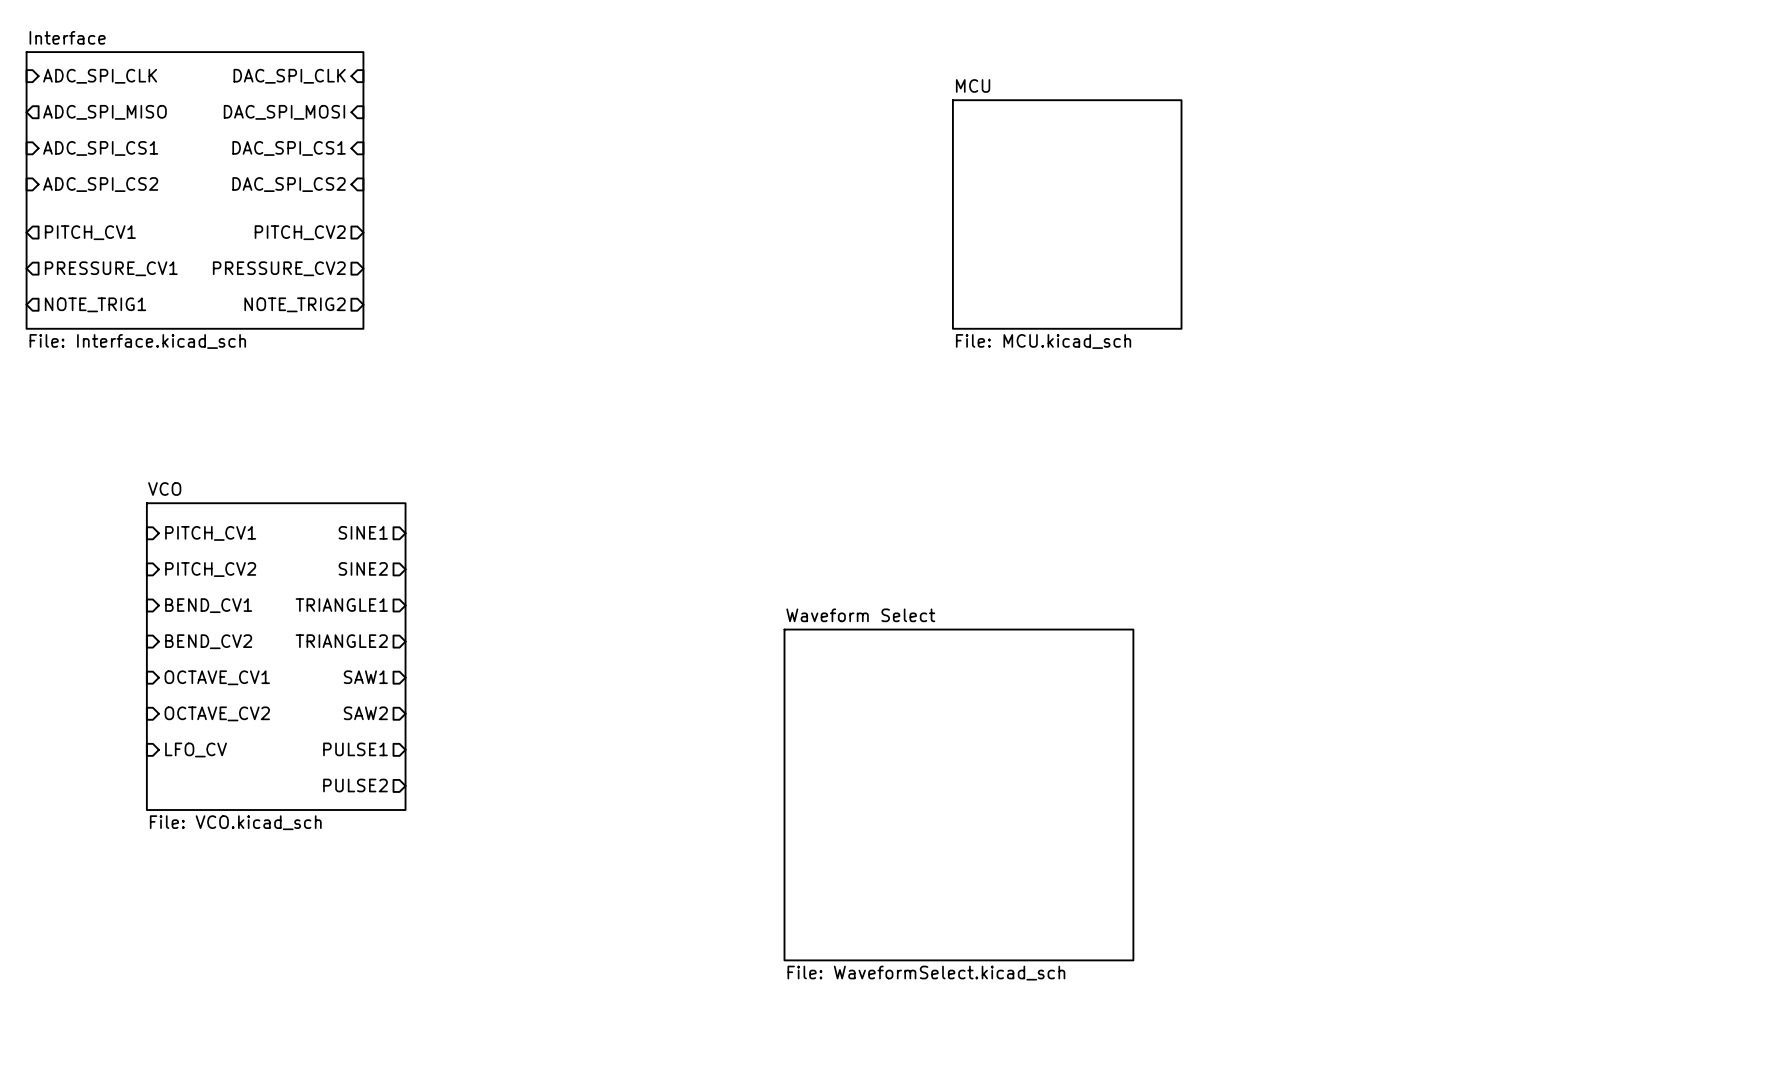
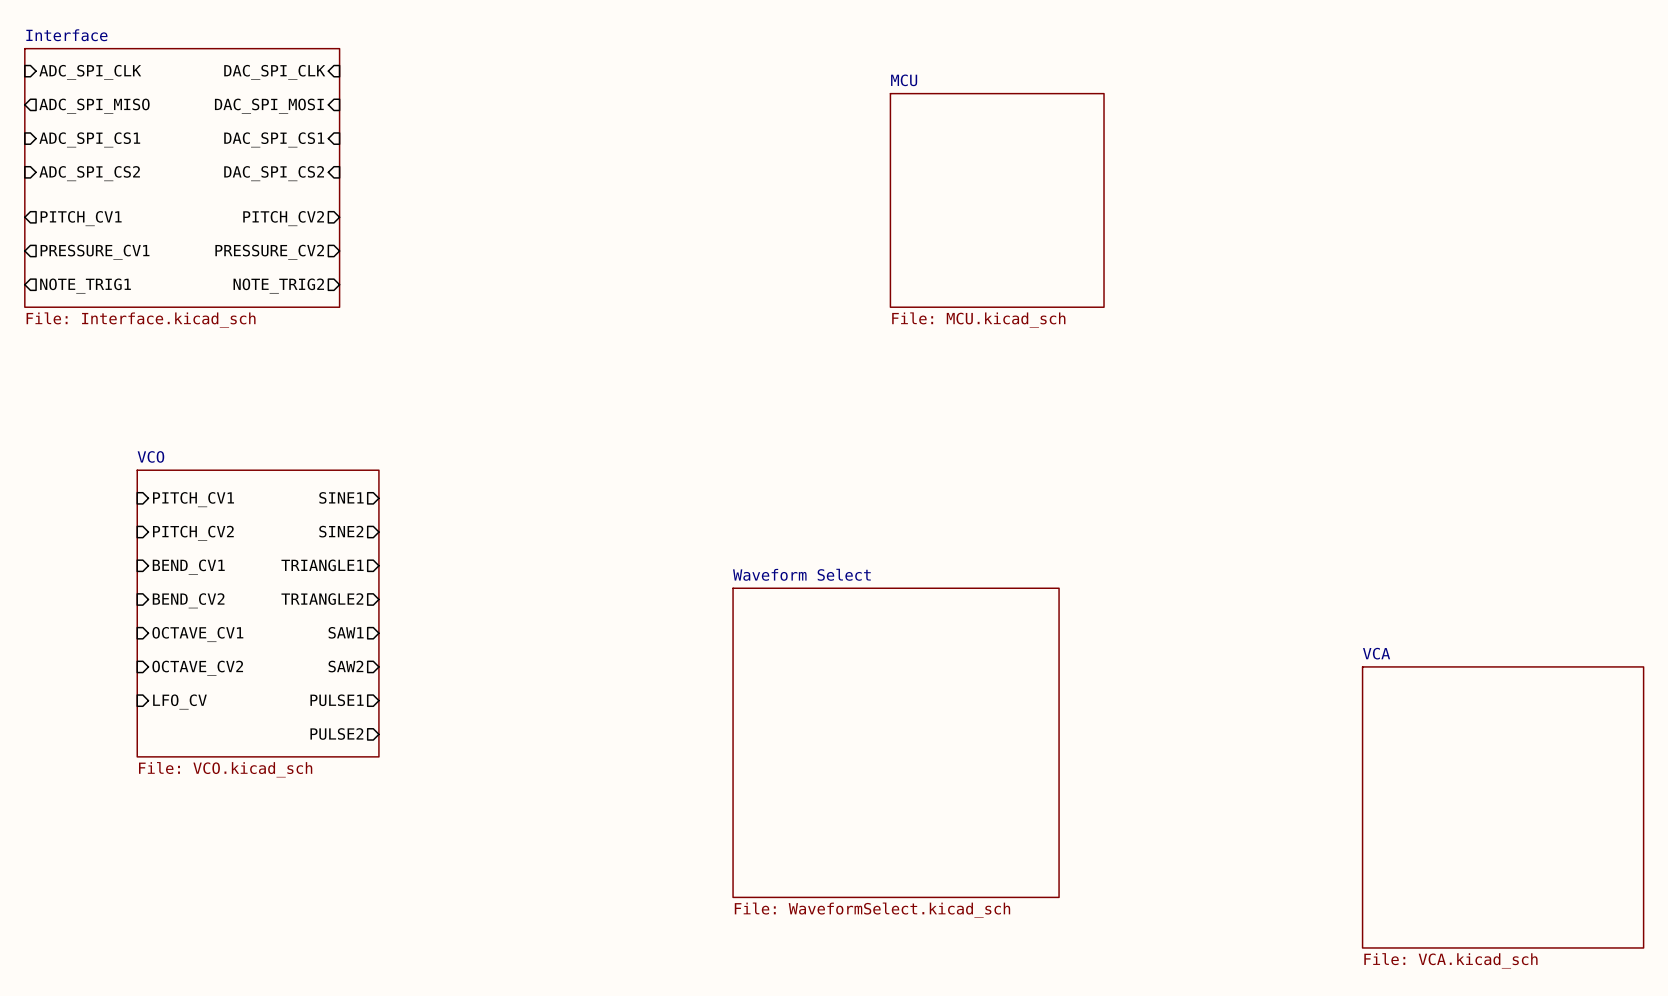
sheet VCA: none -> File: VCA.kicad_sch (1503, 807)

